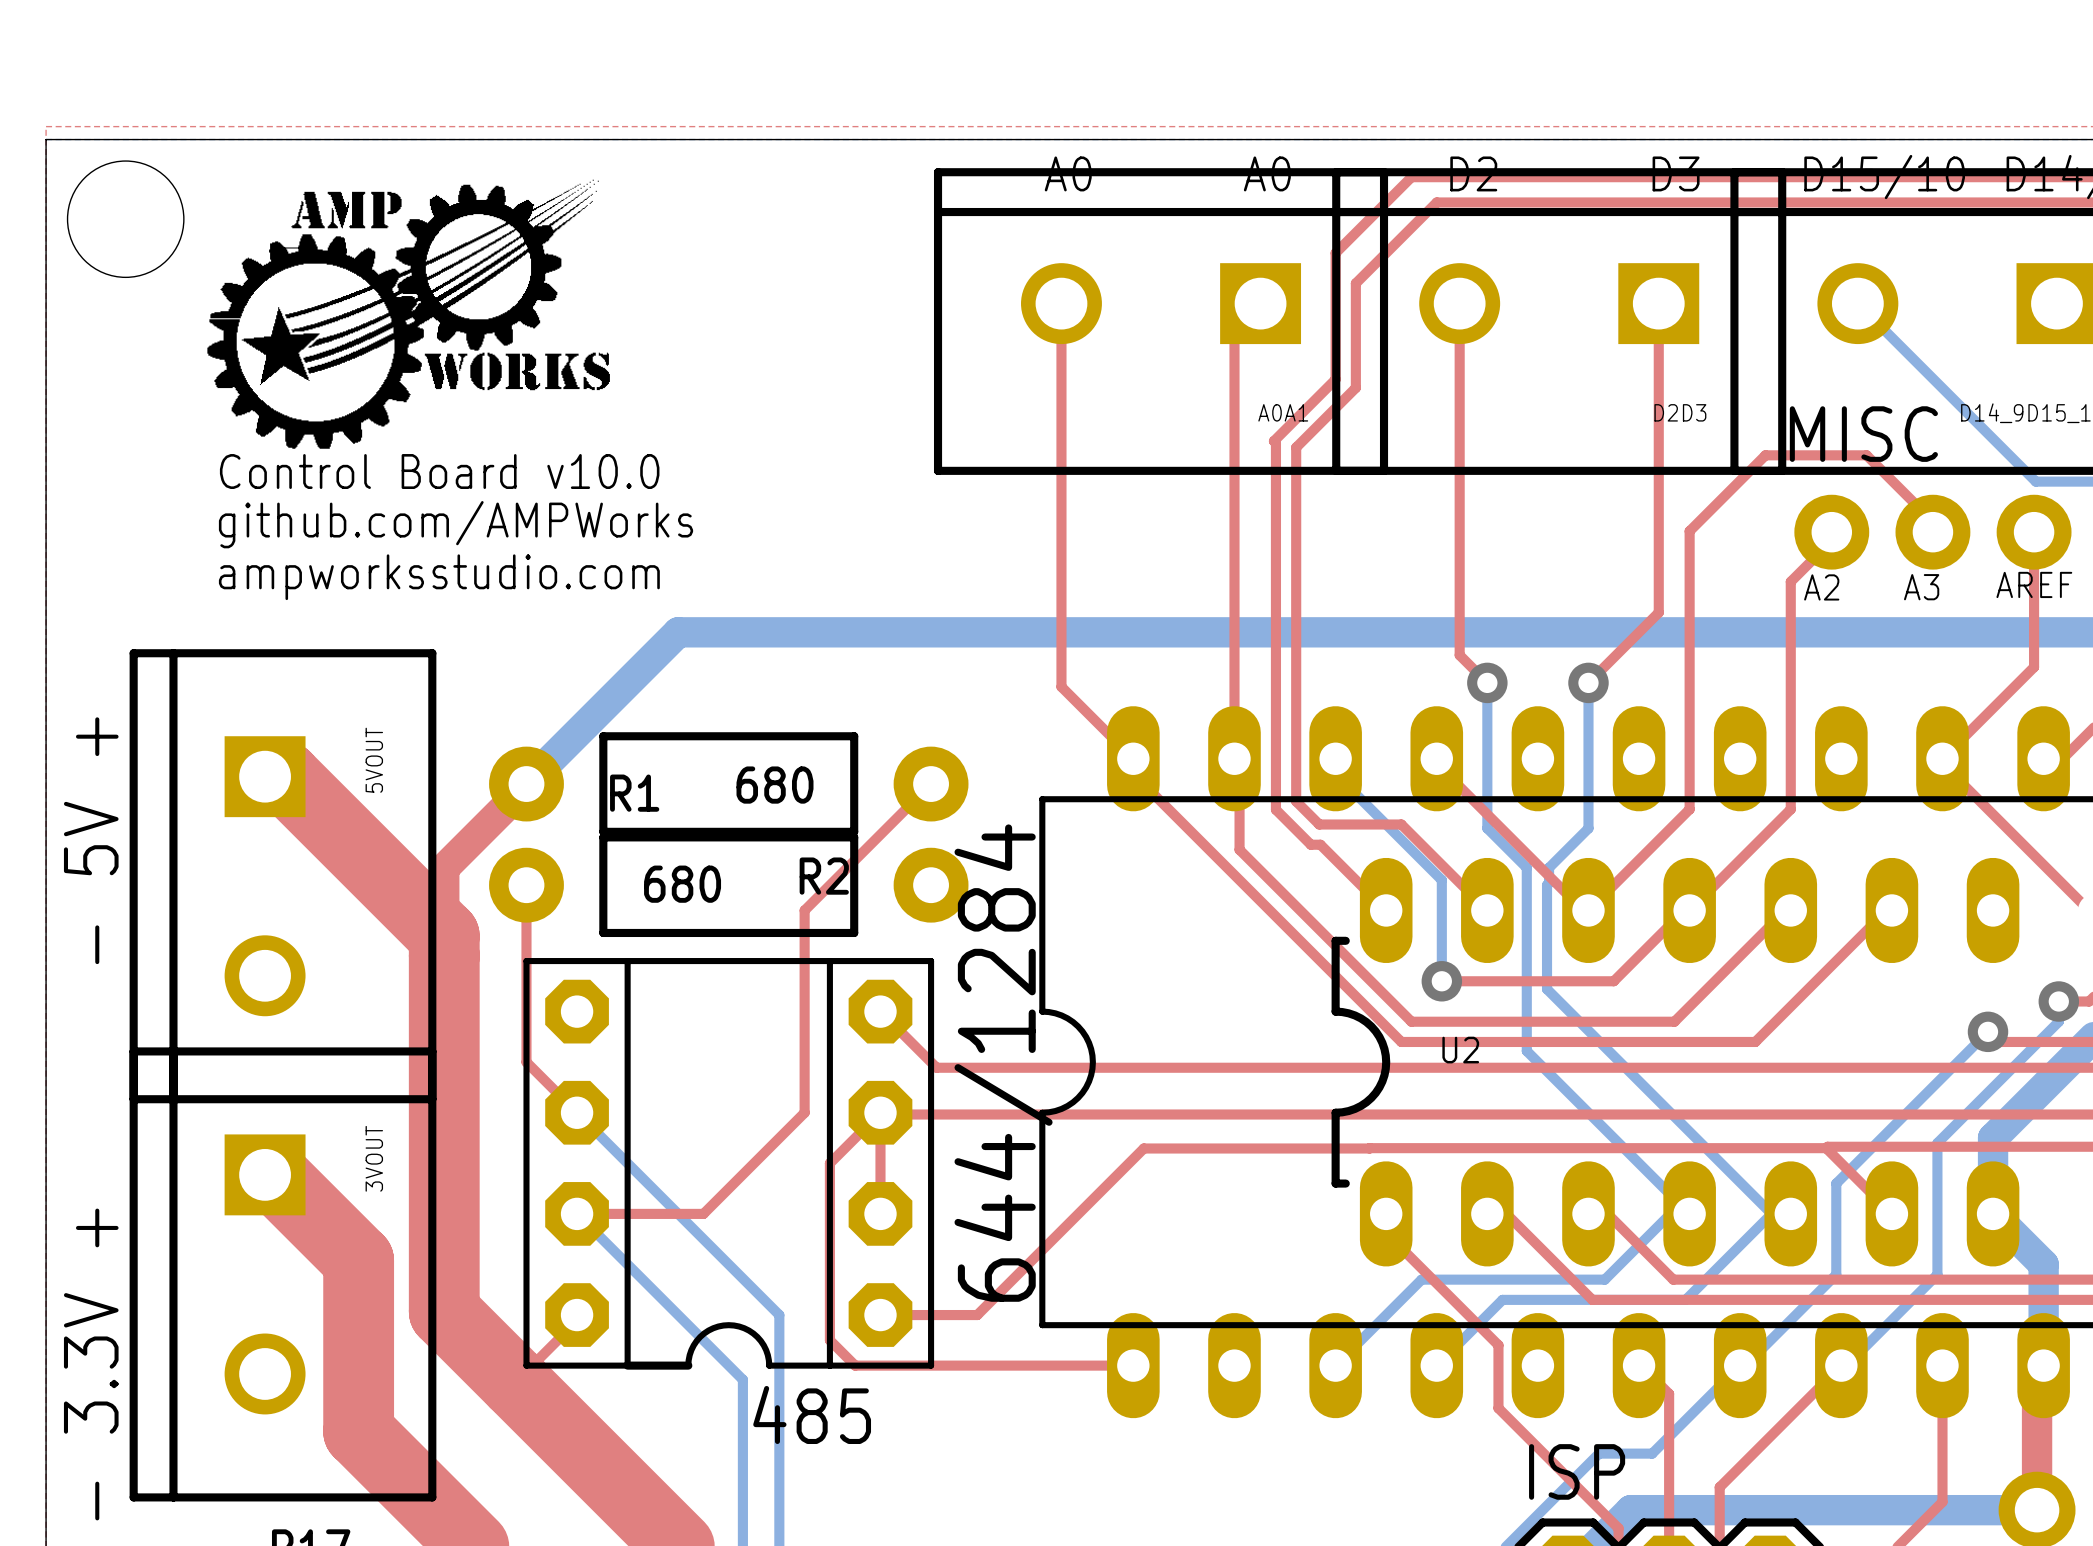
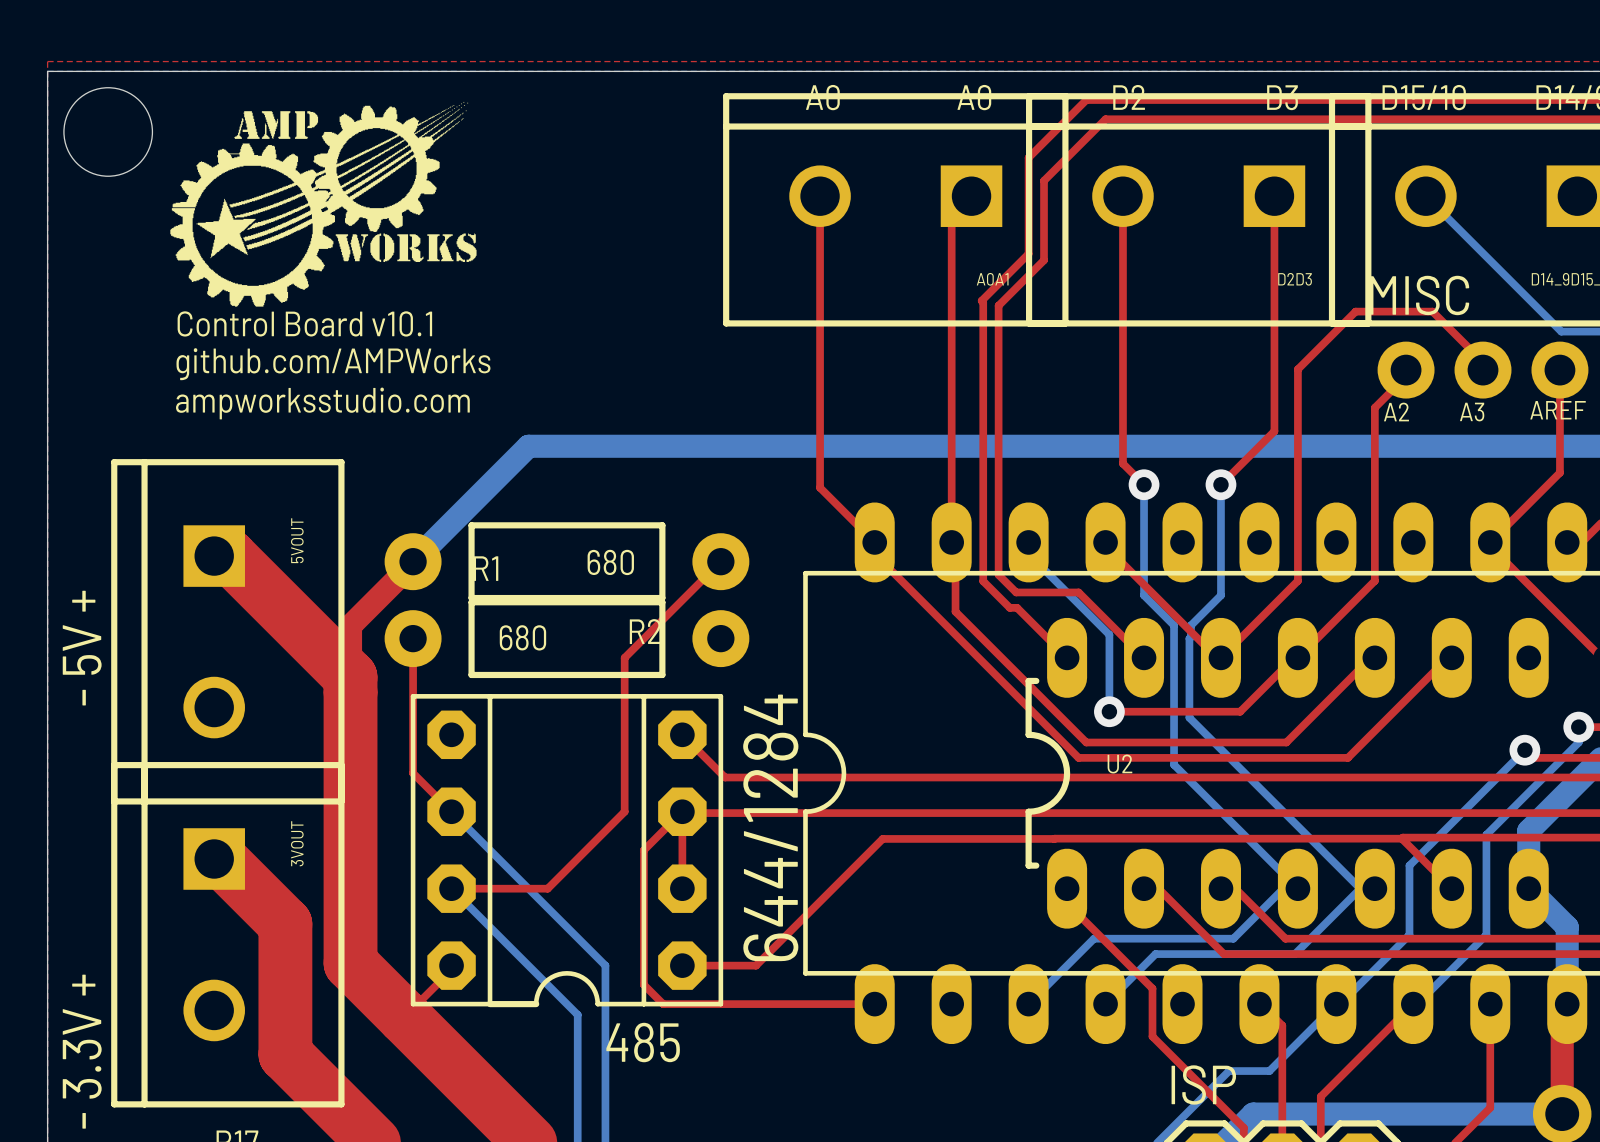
text: Control Board v10.0 (439, 471) -> Control Board v10.1 (304, 323)

